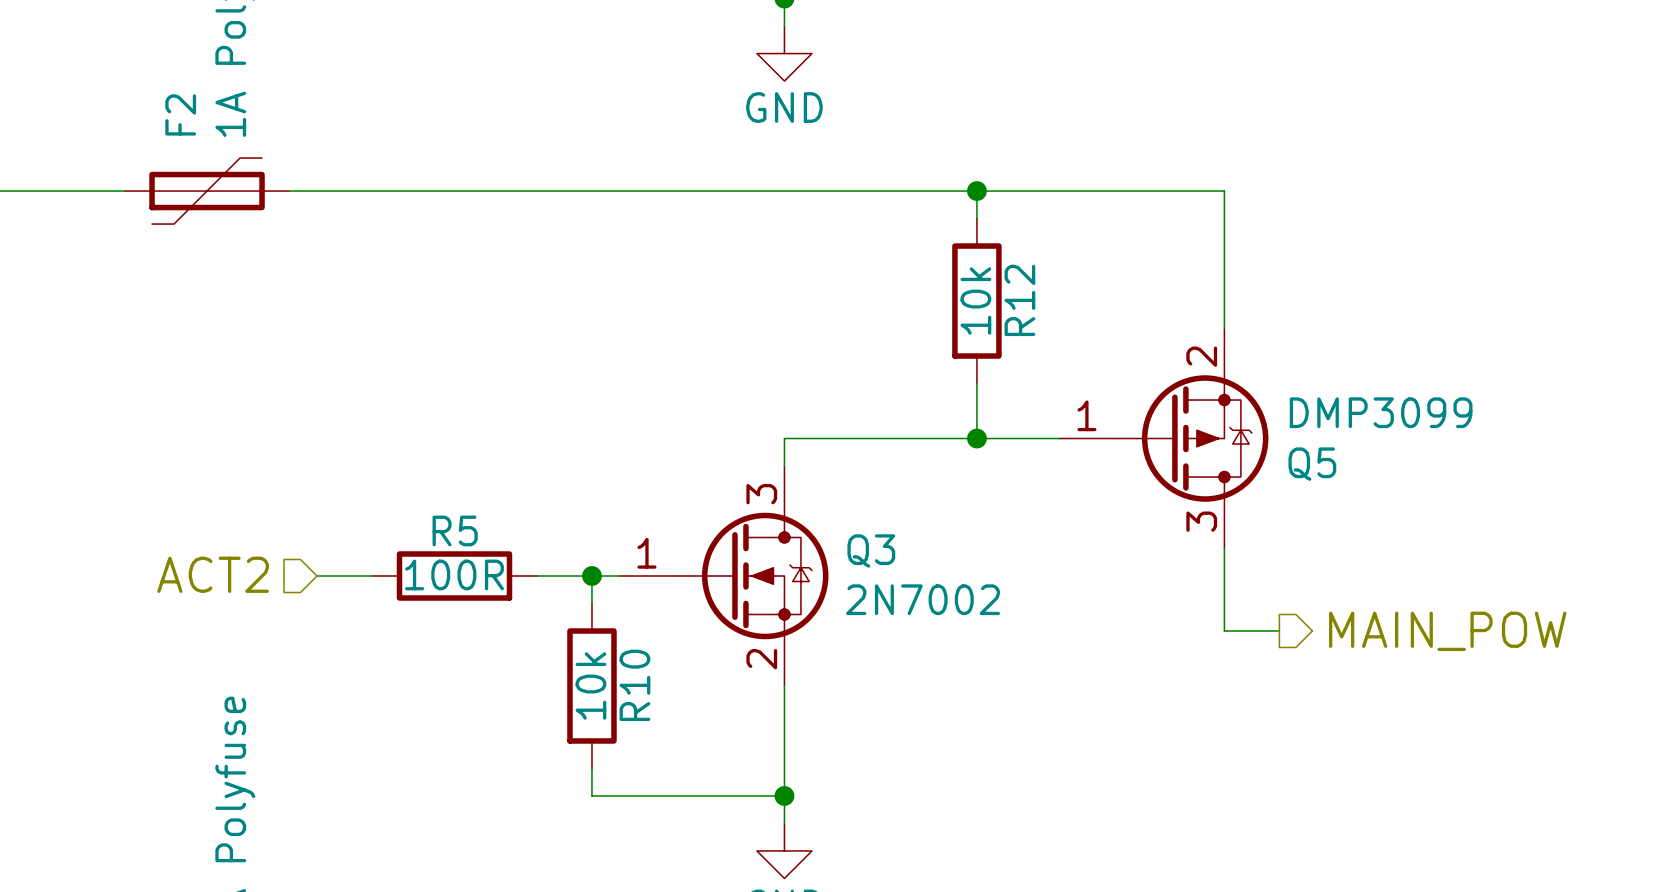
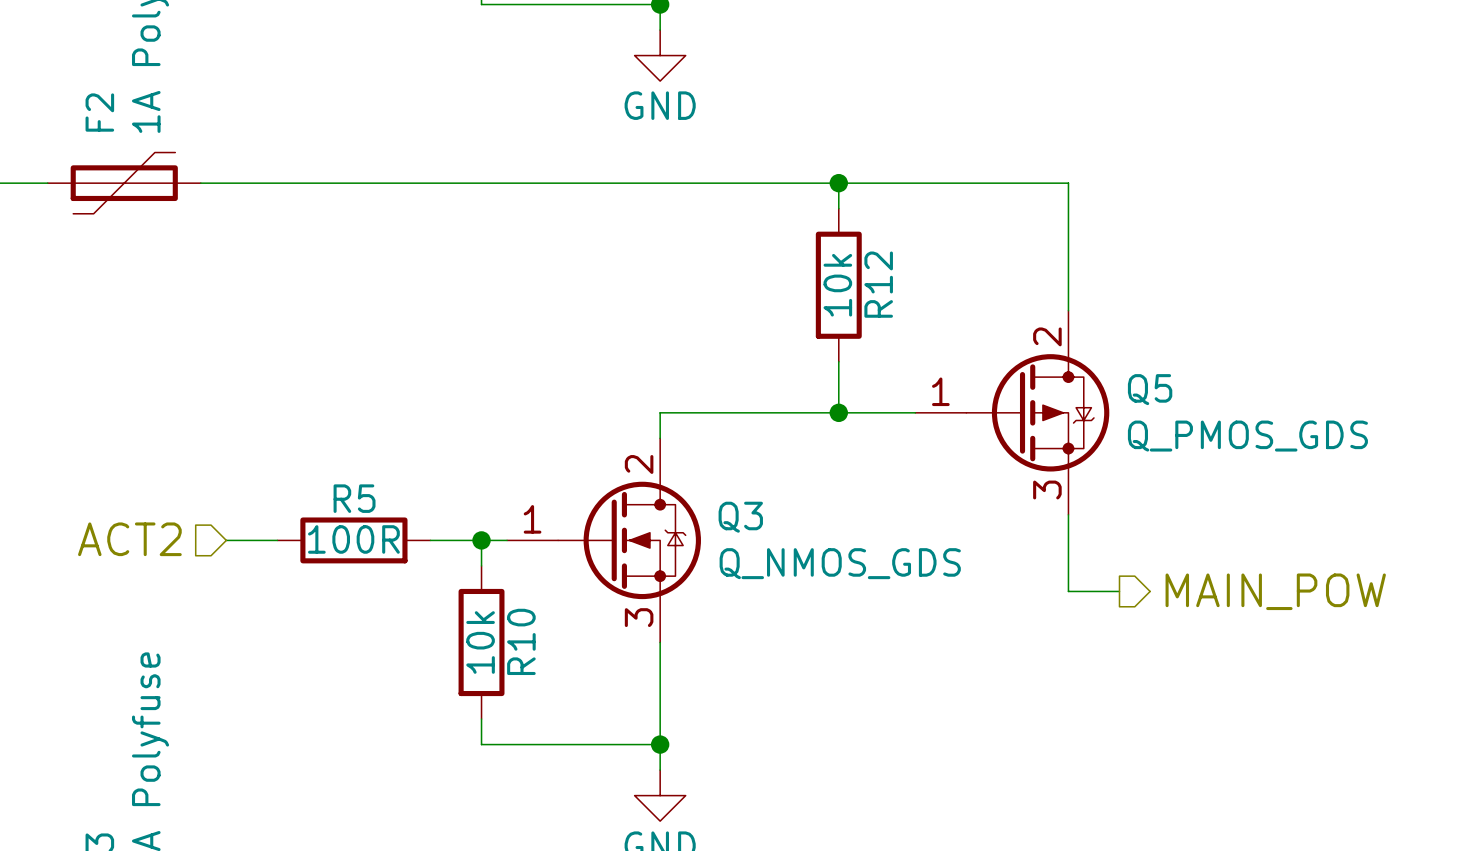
Q5 symbol: [1059, 328, 1269, 549] -> [915, 310, 1110, 515]
Q5 value: DMP3099 (1381, 412) -> Q_PMOS_GDS (1247, 436)
Q5 name position: Q5 (1312, 464) -> Q5 (1150, 389)
Q3 pin number: 3 (761, 494) -> 2 (639, 464)
Q3 value: 2N7002 (923, 599) -> Q_NMOS_GDS (840, 563)
Q3 pin number: 2 (761, 659) -> 3 (639, 617)

